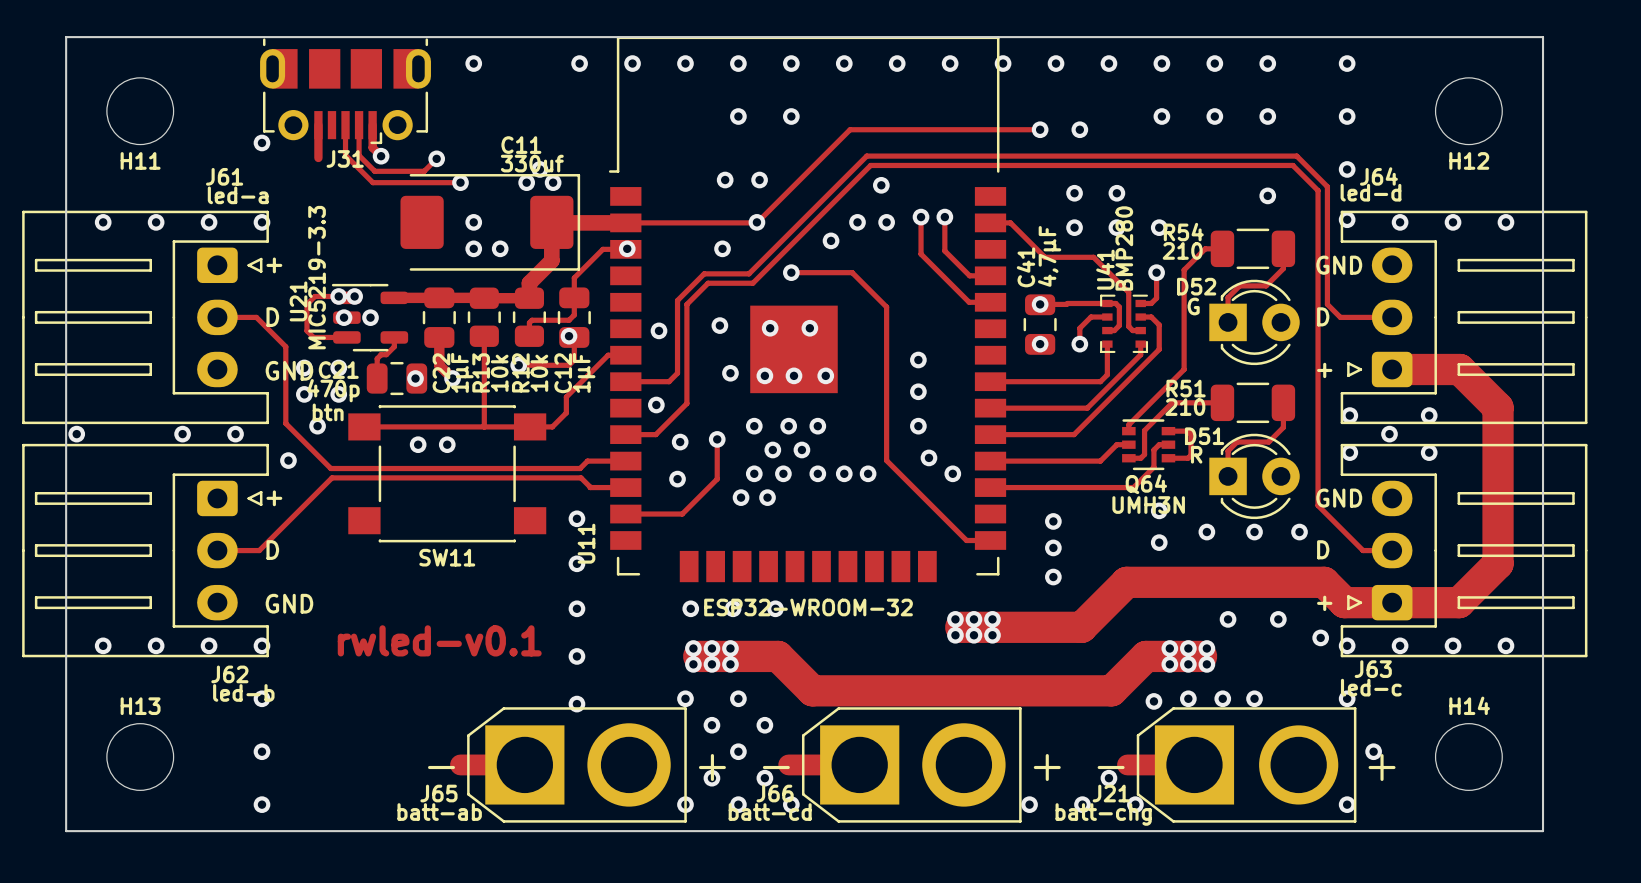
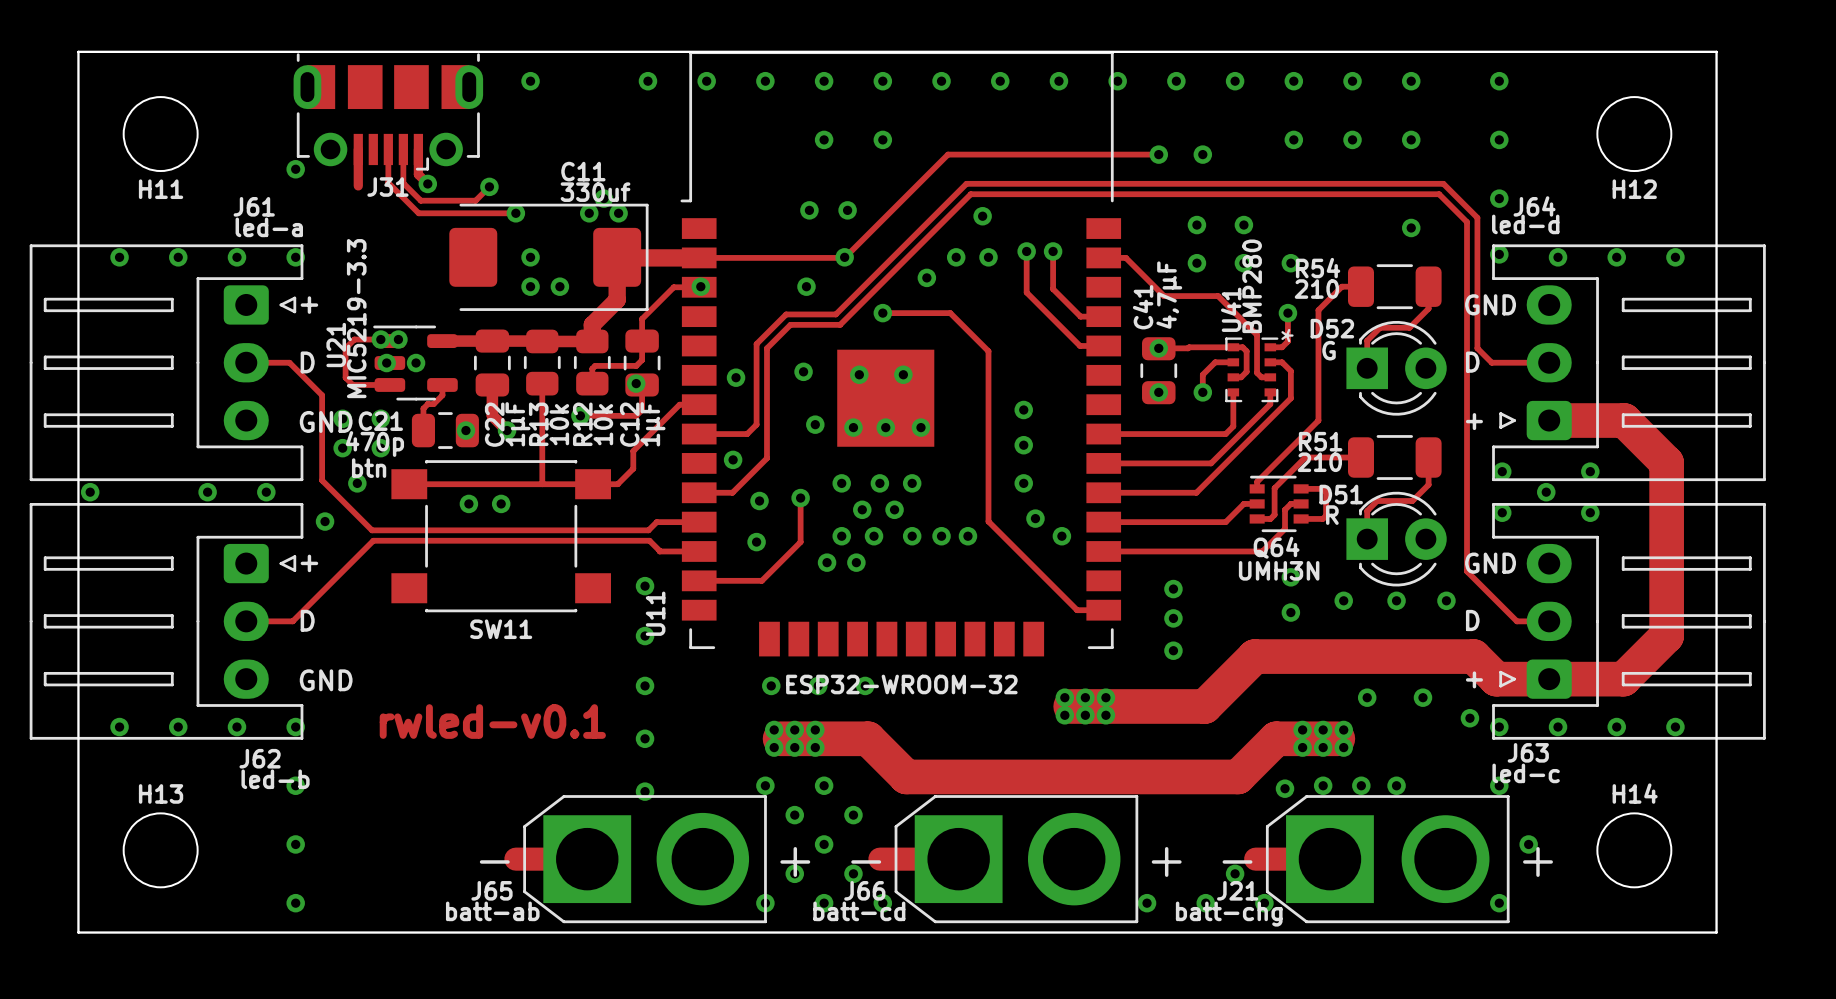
U41 text: none -> * (1287, 335)

